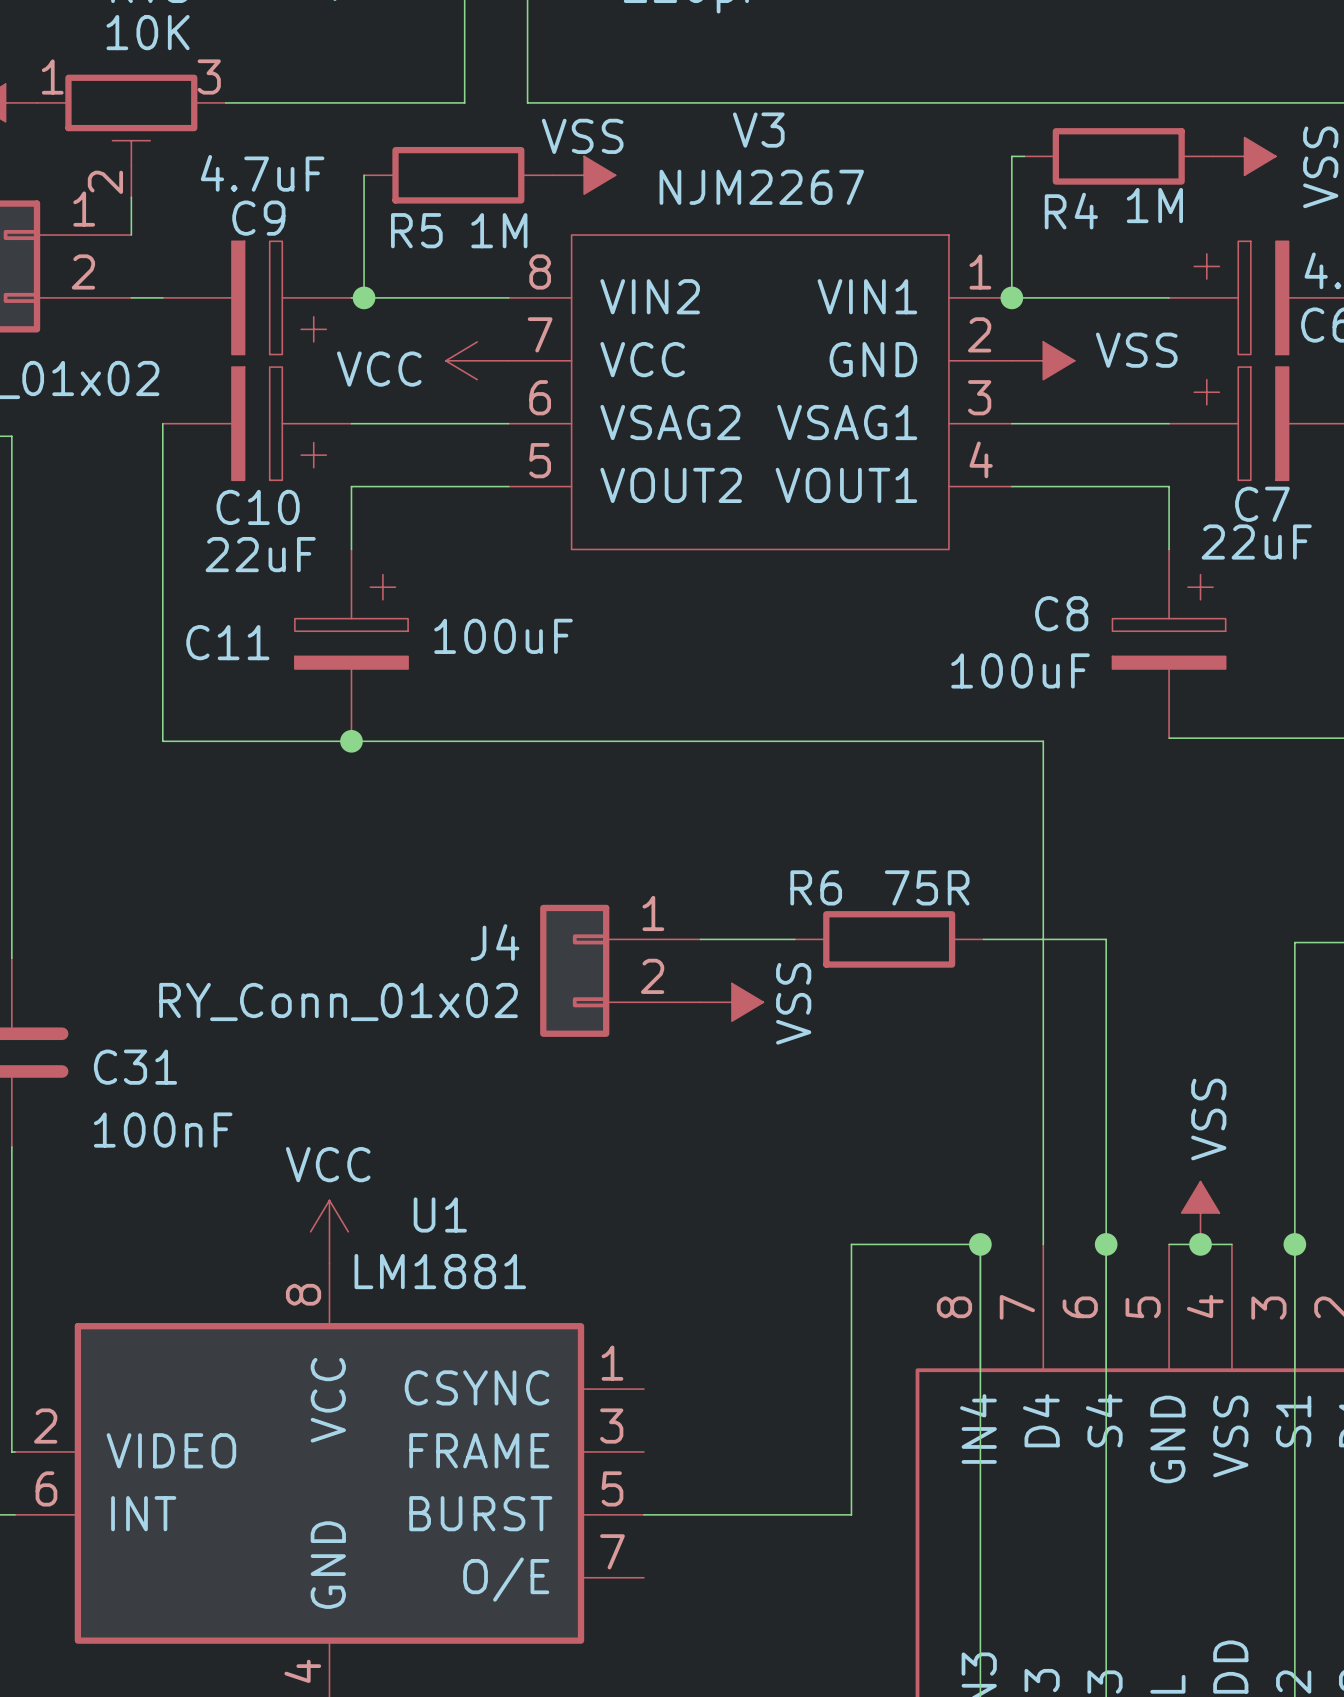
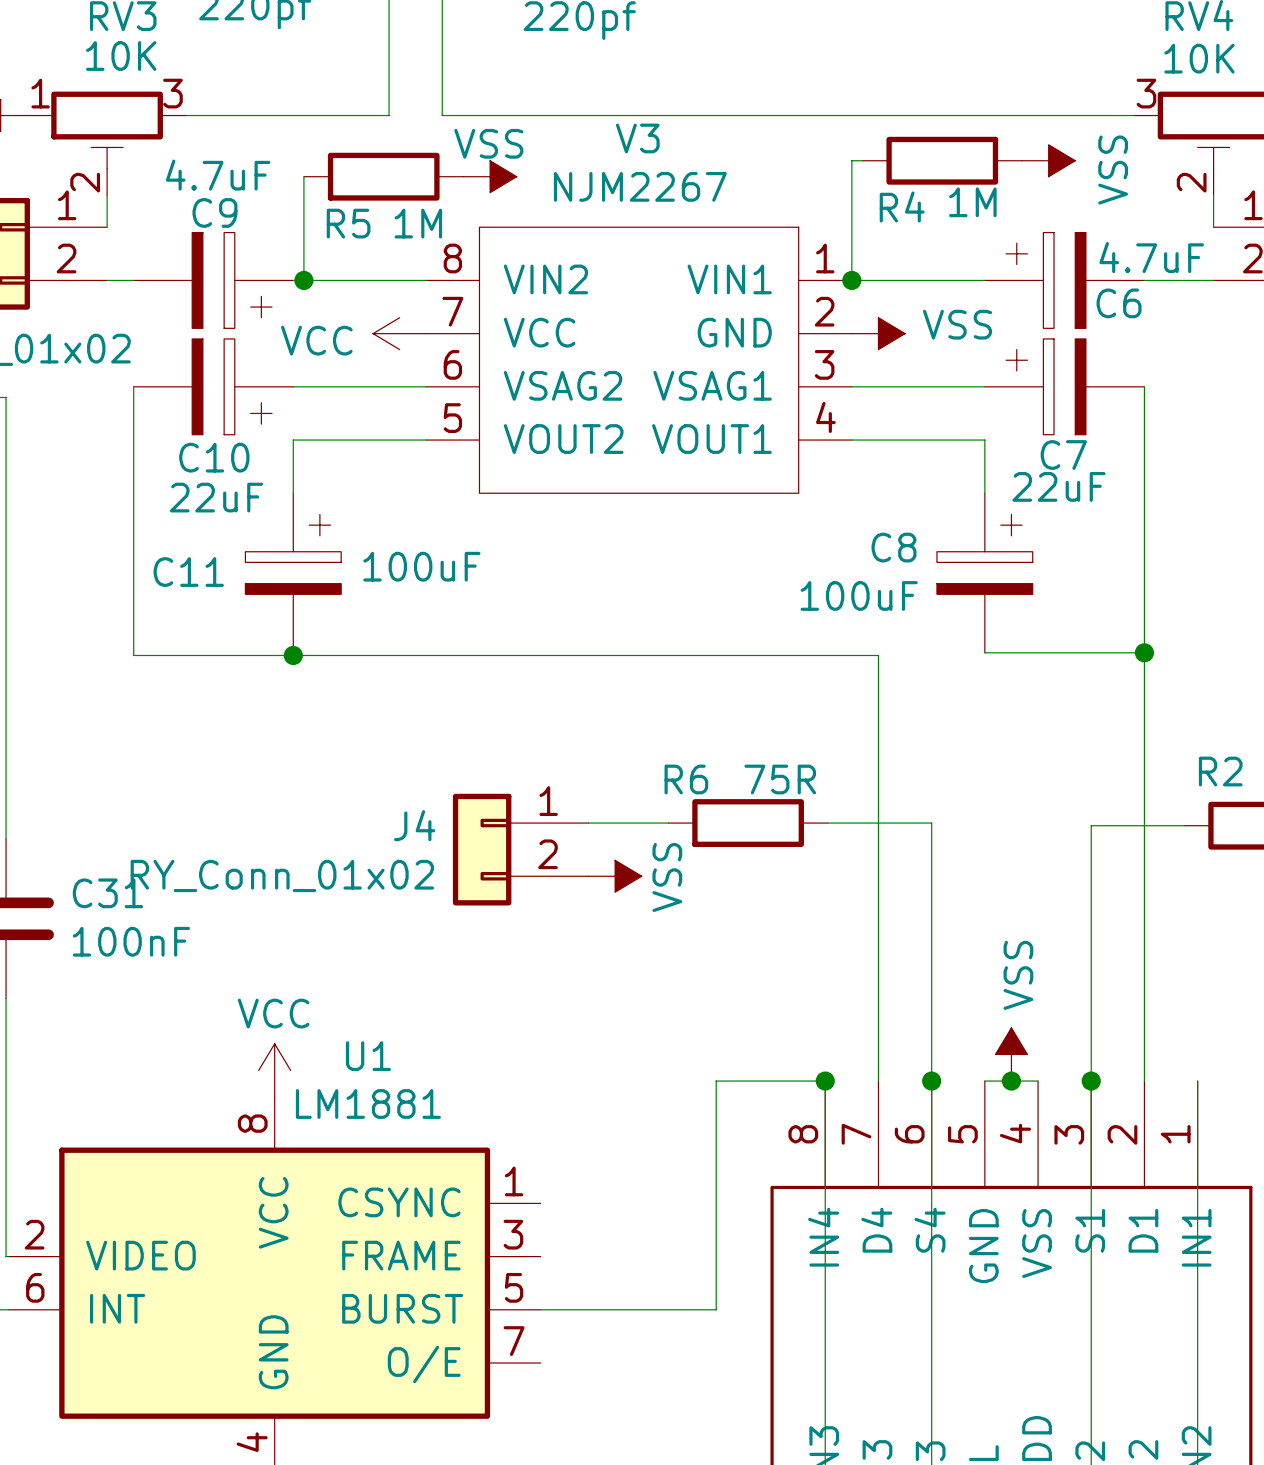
C31 name position: C31 (135, 1067) -> C31 (107, 893)
C31 value position: 100nF (163, 1130) -> 100nF (131, 941)

